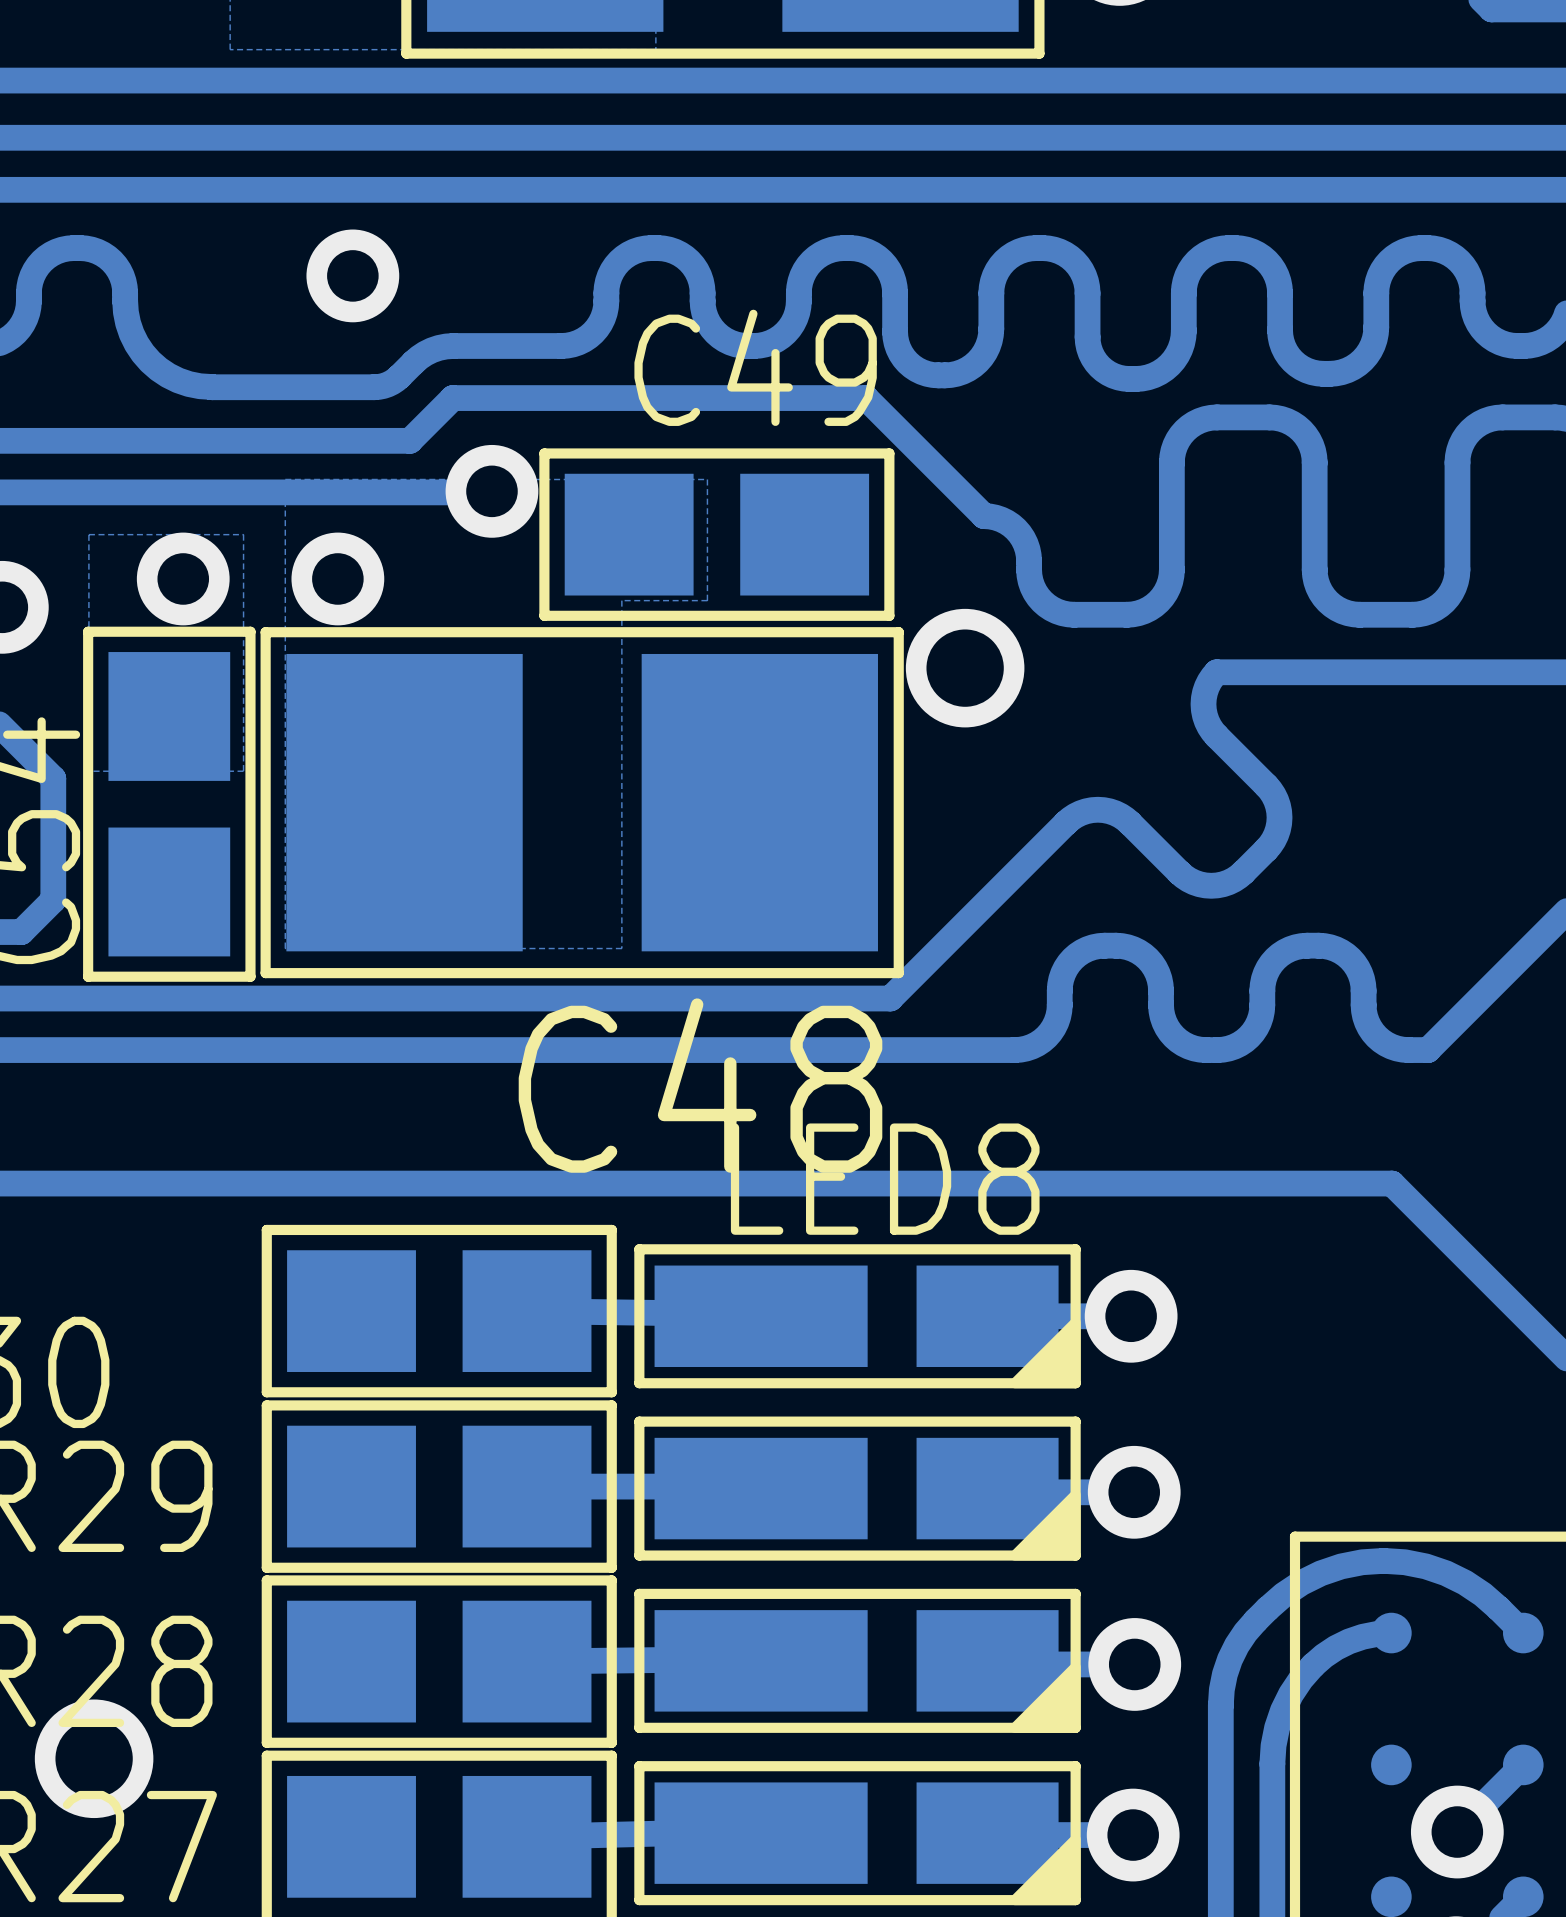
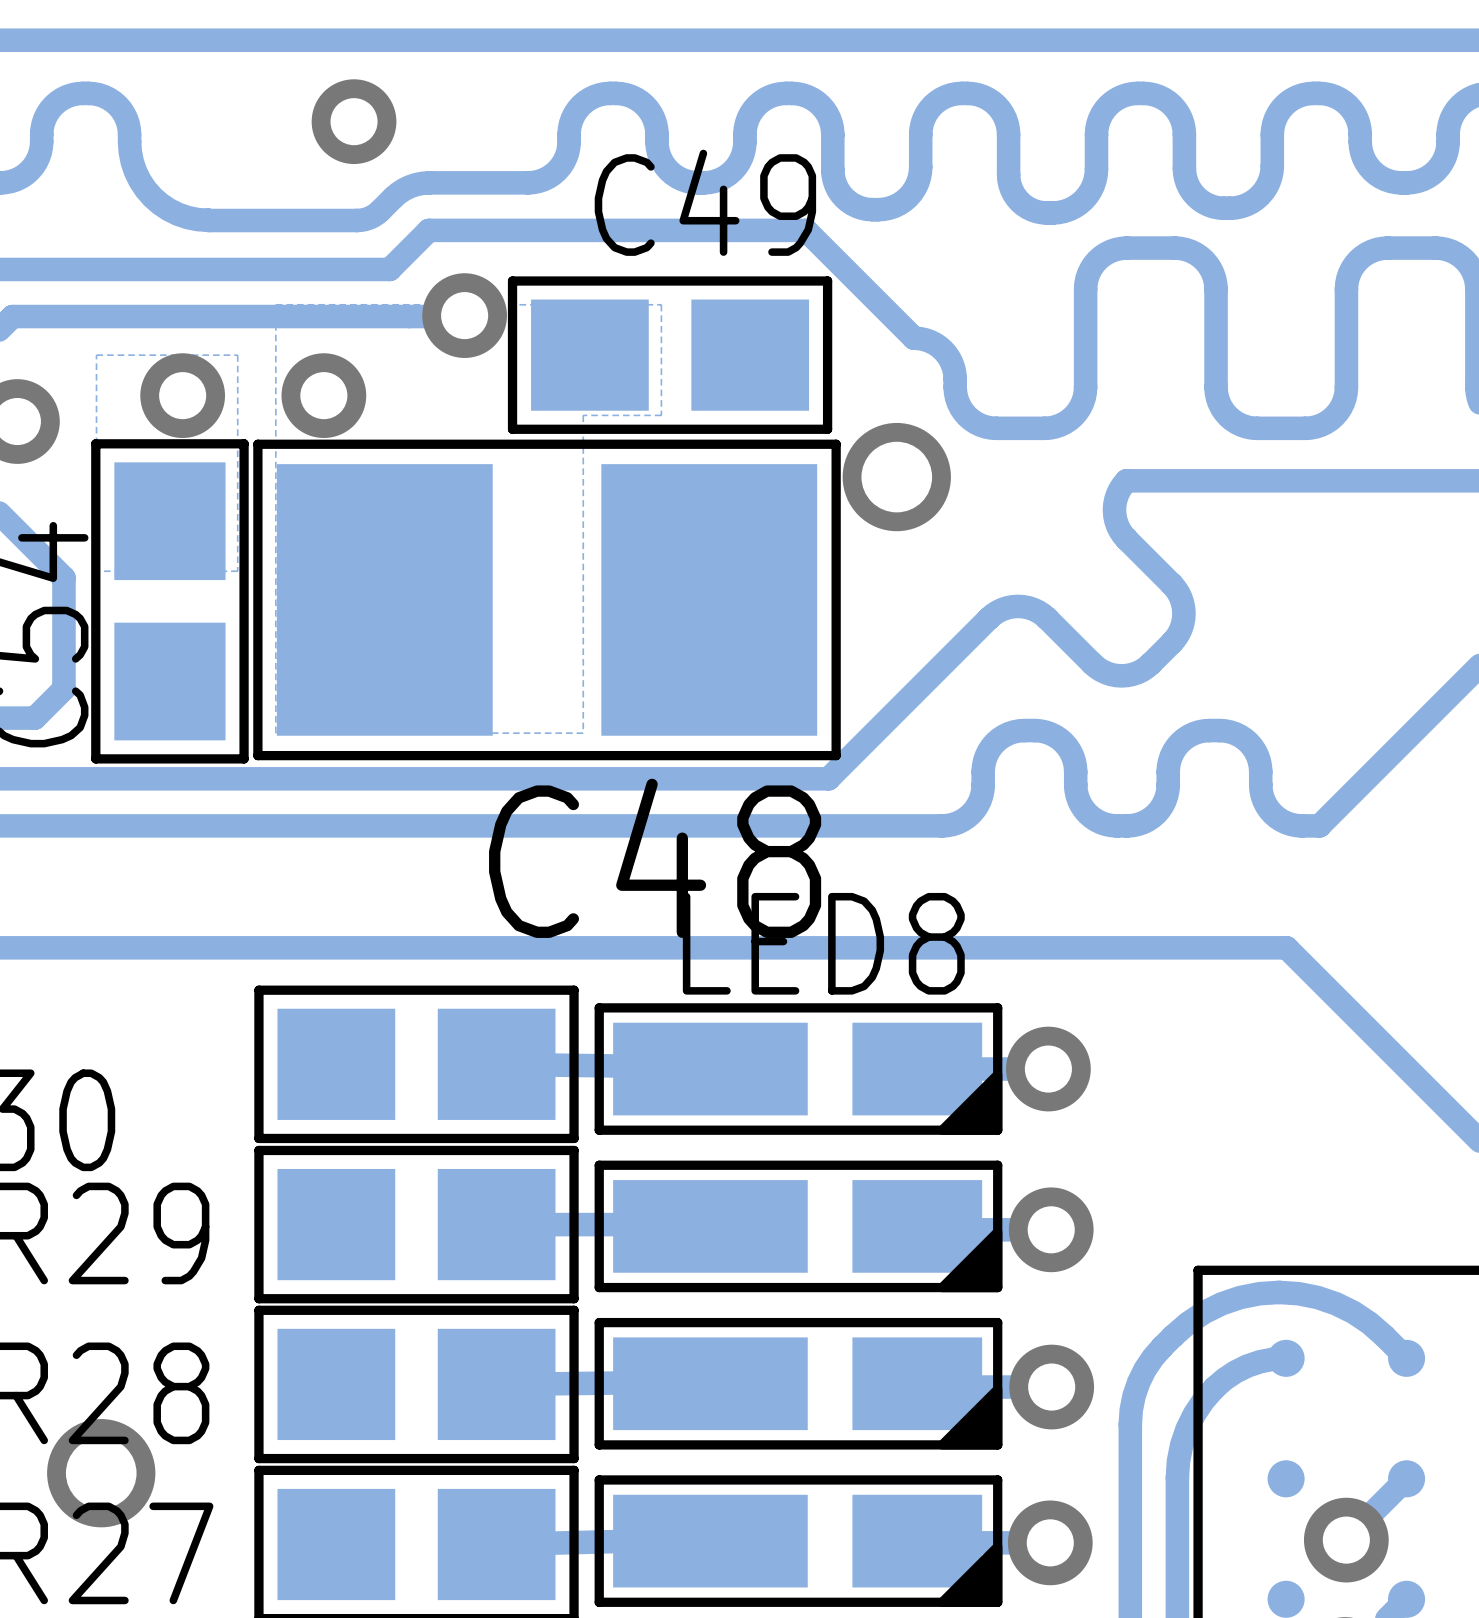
via position: (352, 275) -> (354, 121)

